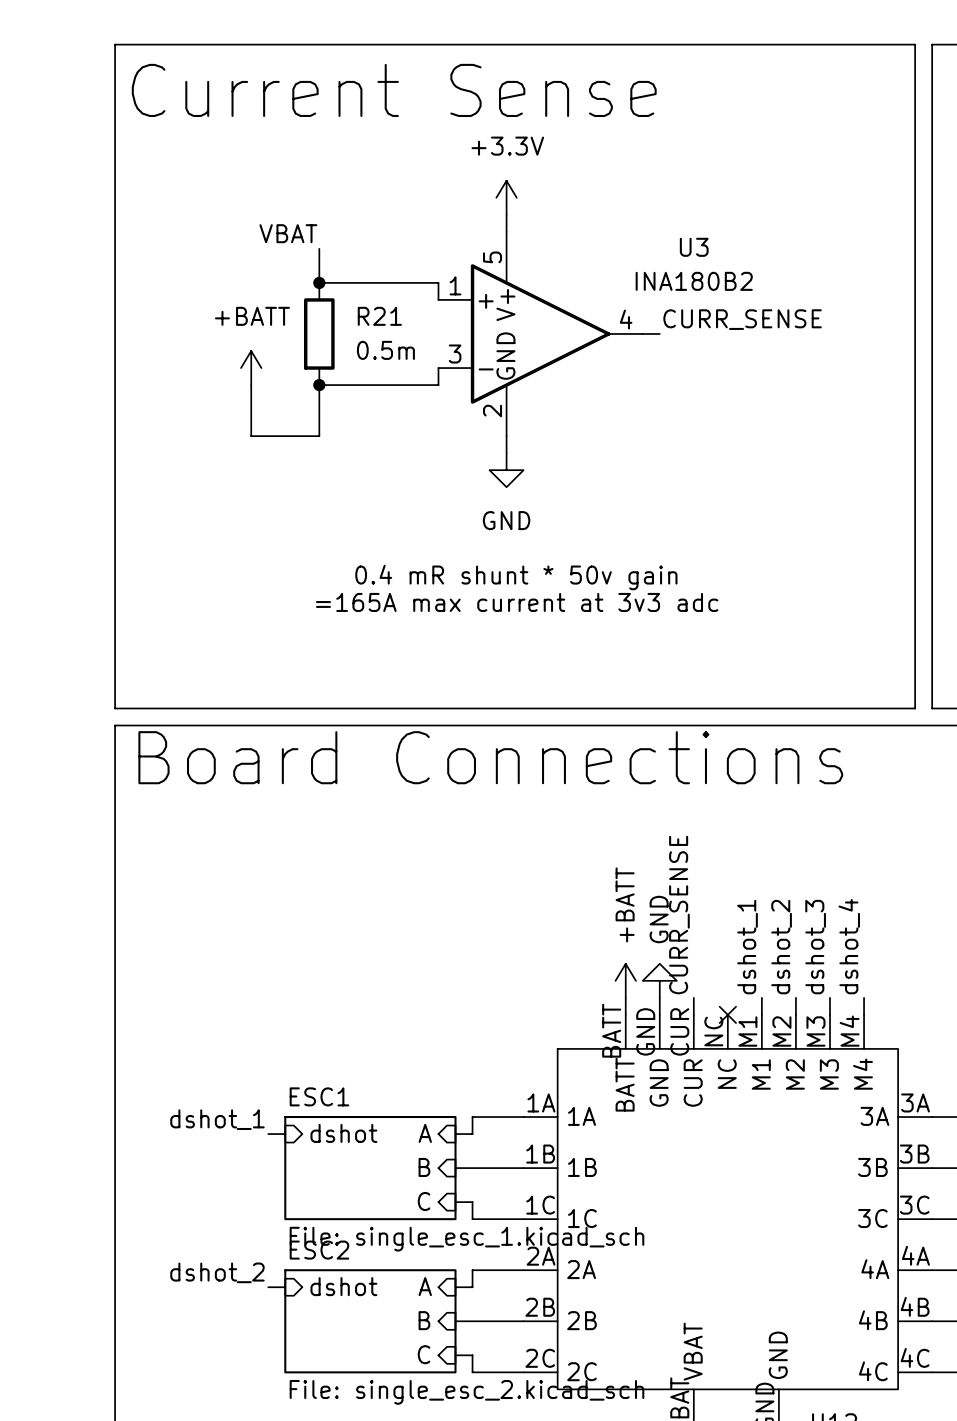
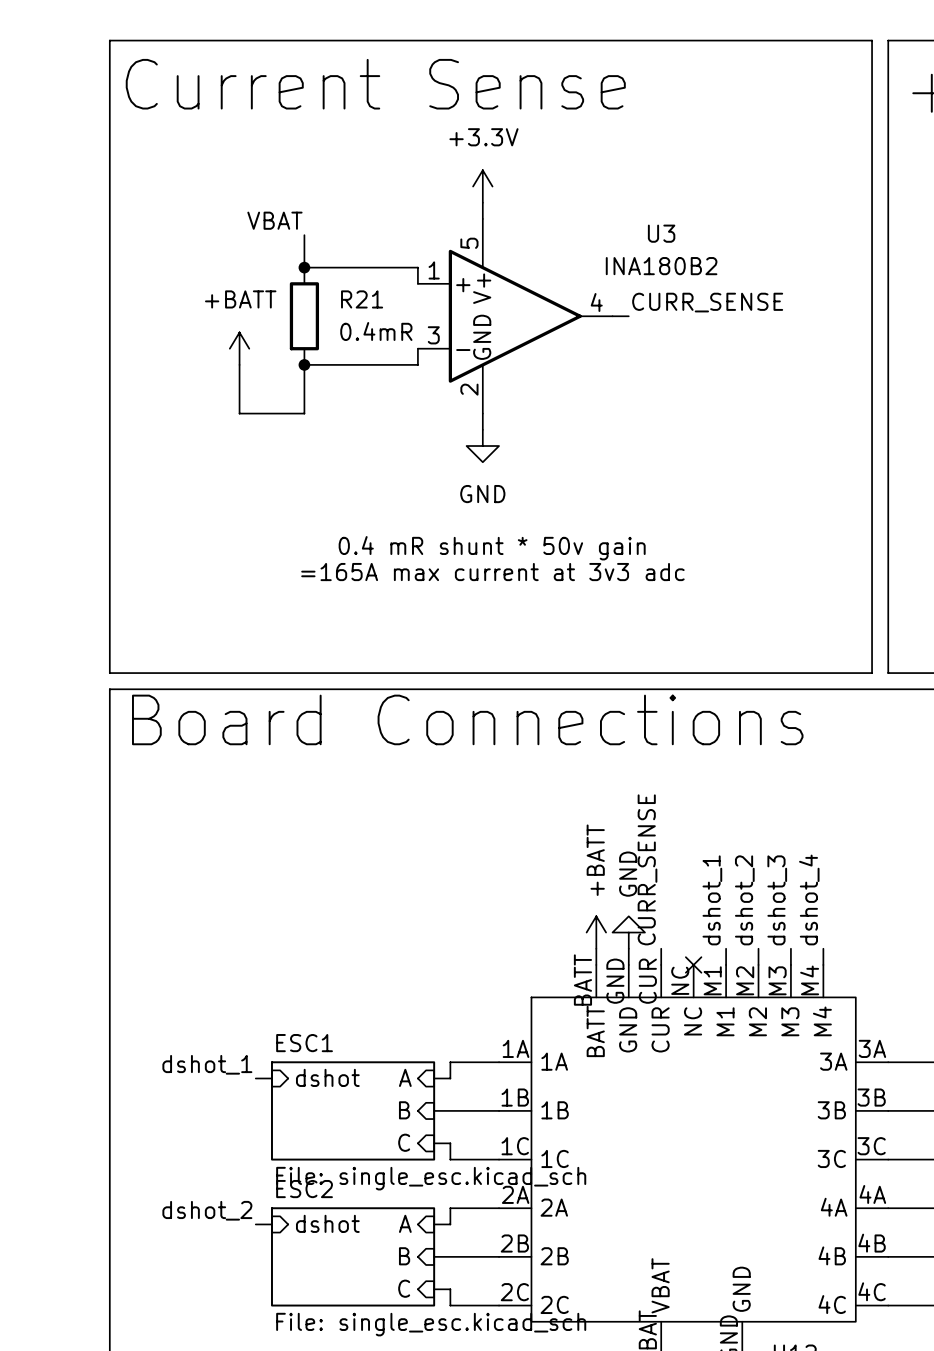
R21 value: 0.5m (385, 350) -> 0.4mR (376, 331)
sheet ESC1 value: File: single_esc_1.kicad_sch (466, 1239) -> File: single_esc.kicad_sch (431, 1178)
sheet ESC2 value: File: single_esc_2.kicad_sch (466, 1392) -> File: single_esc.kicad_sch (431, 1324)

